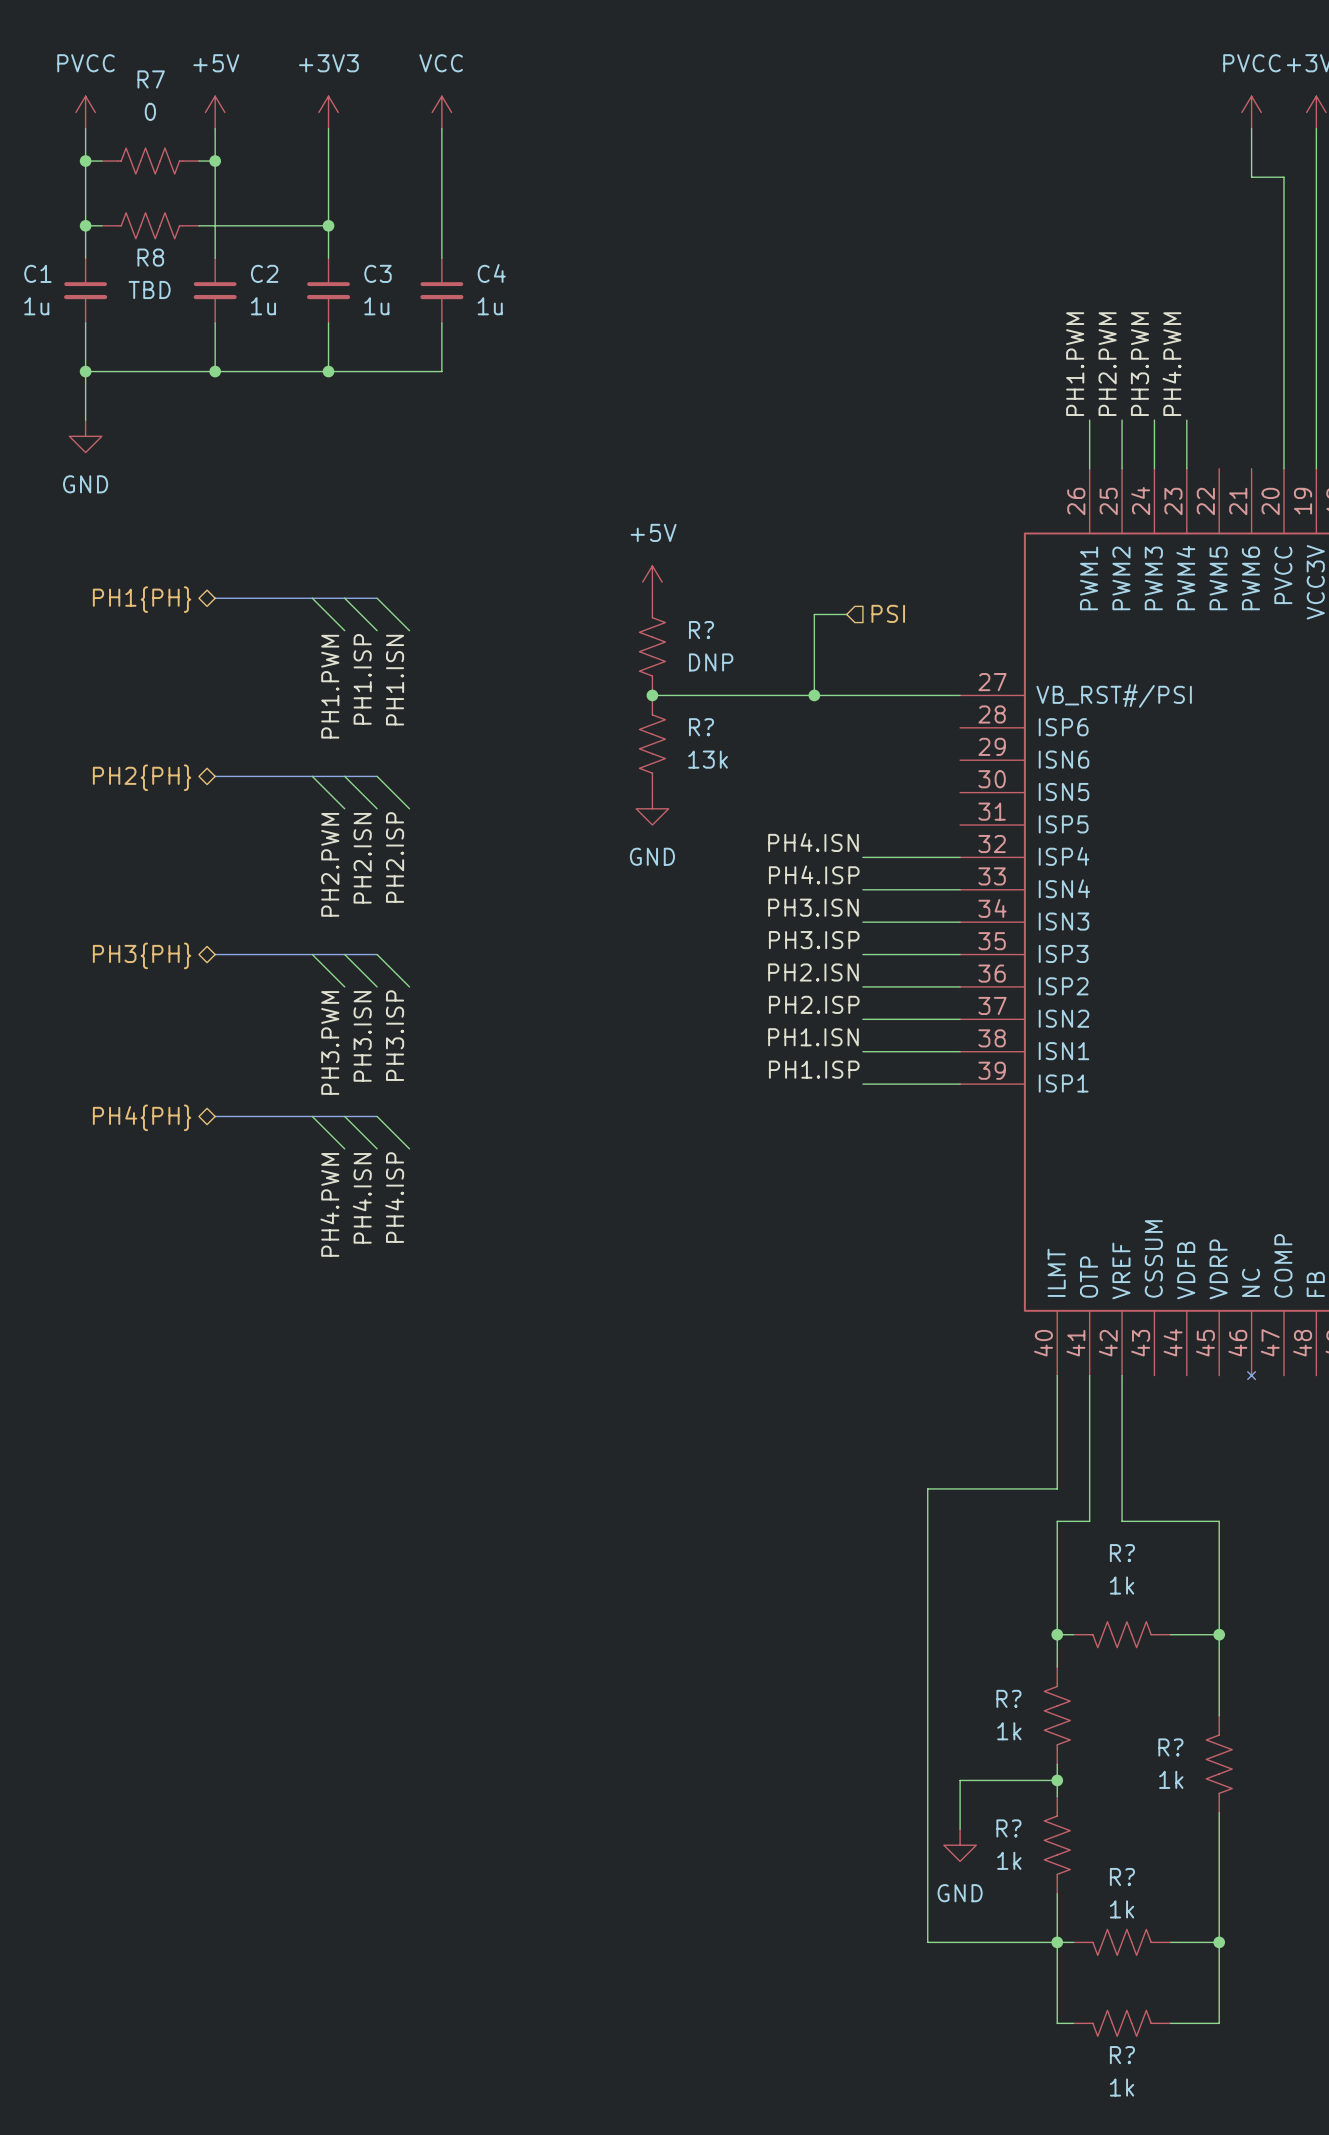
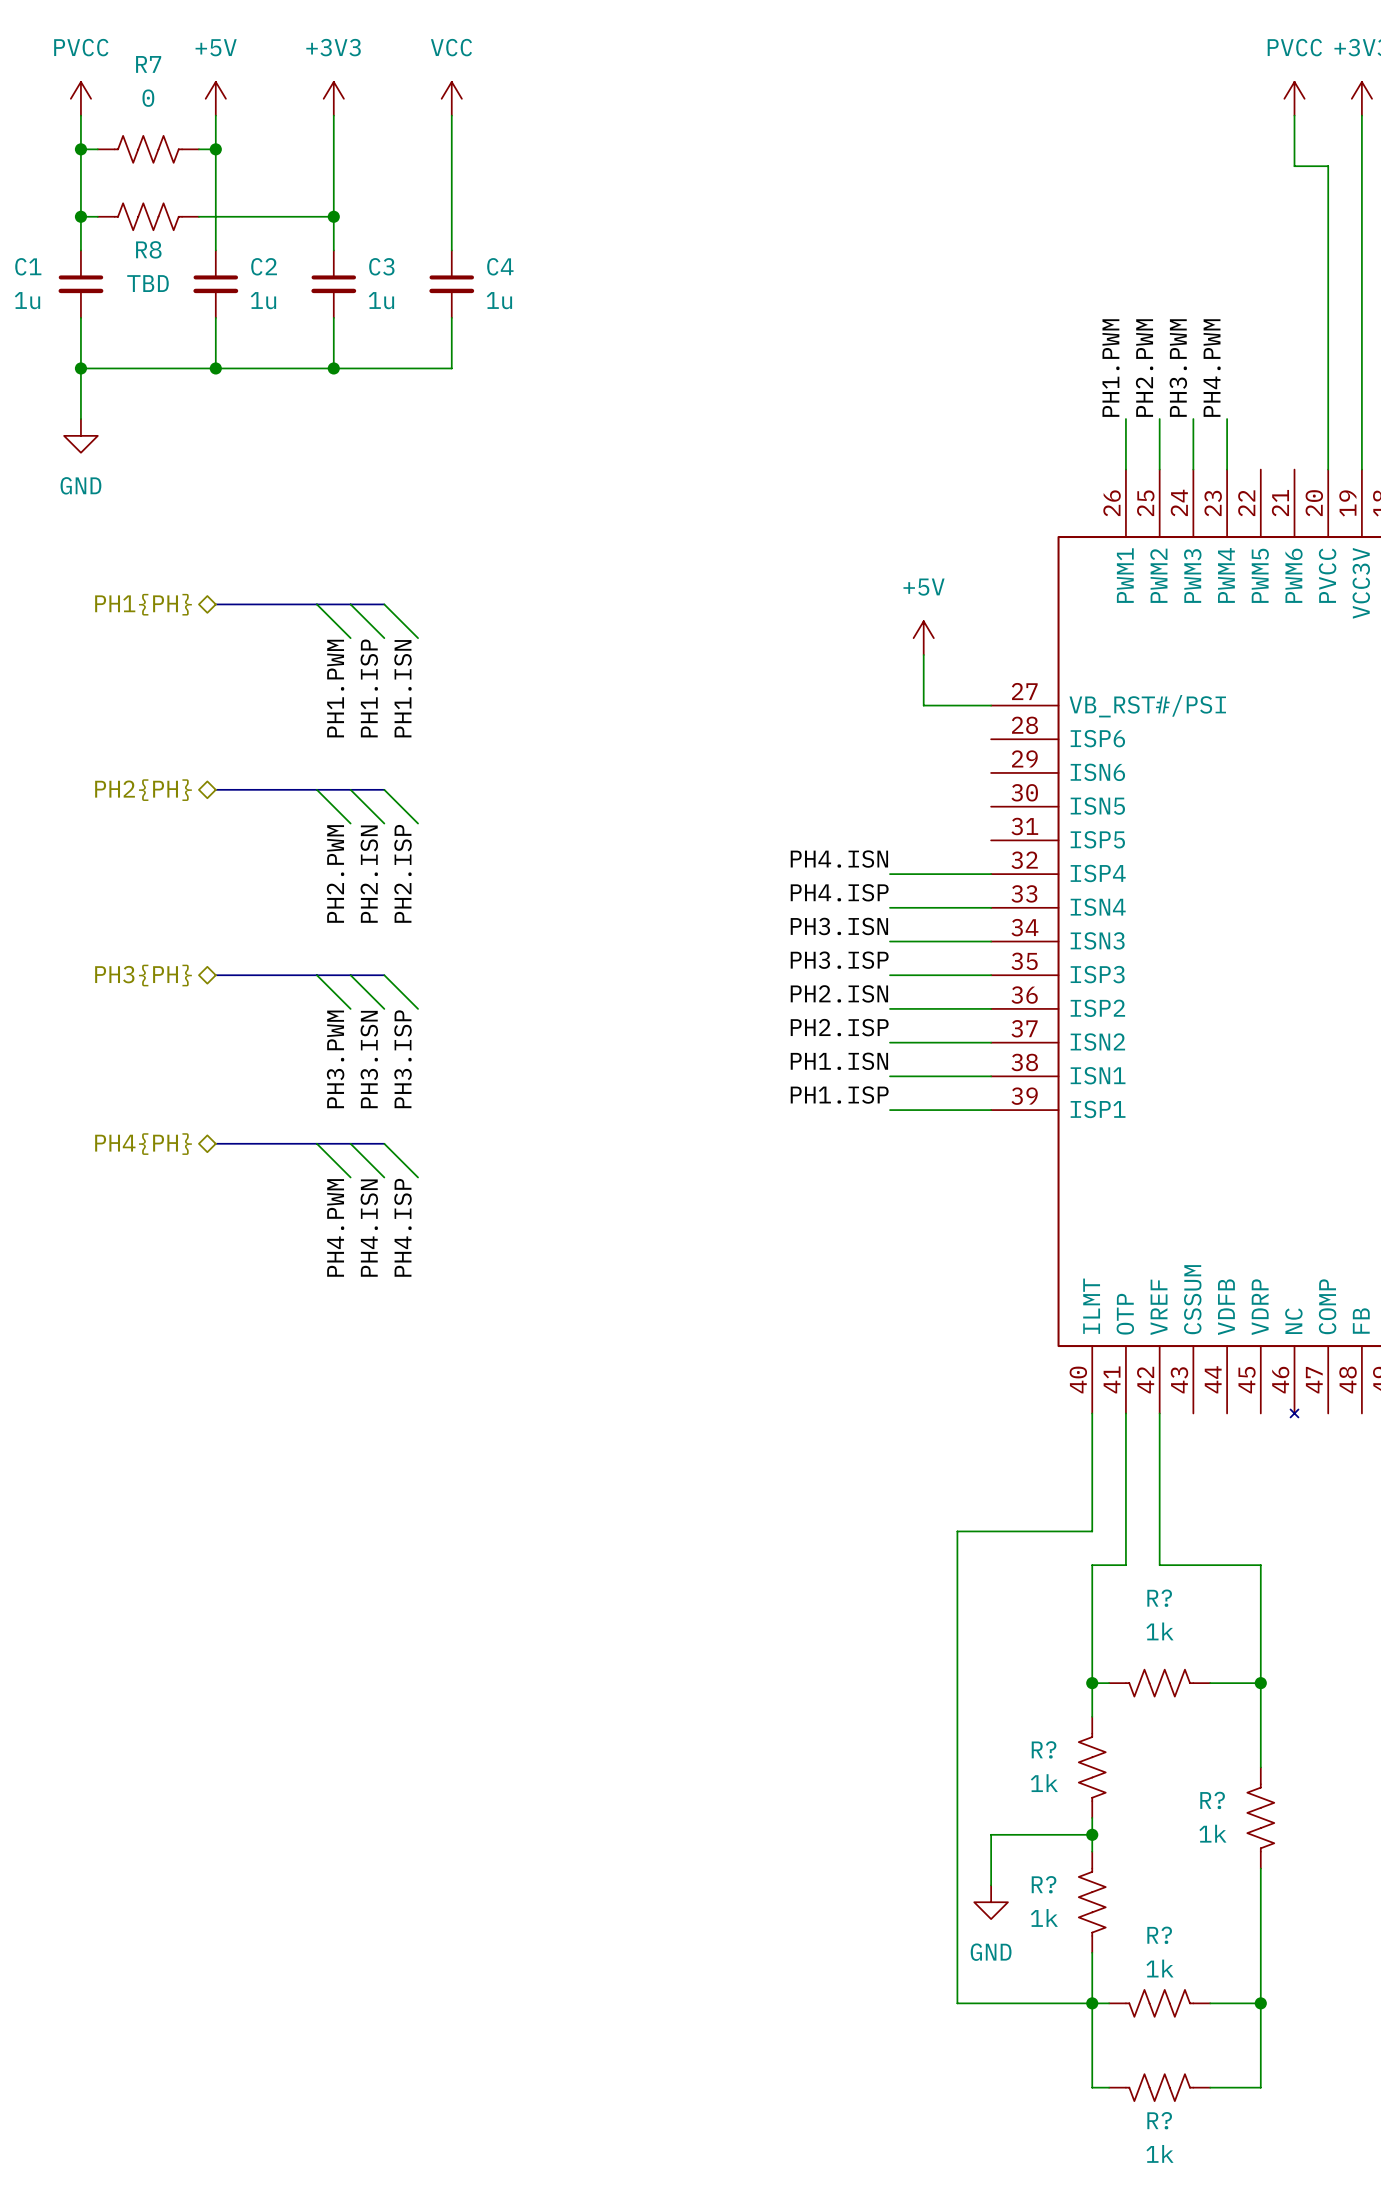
power symbol position: +5V (652, 582) -> +5V (923, 638)
hierarchical label: PSI (888, 613) -> none
wire: (846, 614) (814, 614) (814, 695) -> none
R?: DNP (652, 646) -> none
wire: (652, 695) (895, 695) -> (923, 654) (923, 705)
junction: (652, 695) -> none
junction: (814, 695) -> none
R?: 13k (652, 744) -> none
power symbol: GND (652, 808) -> none

